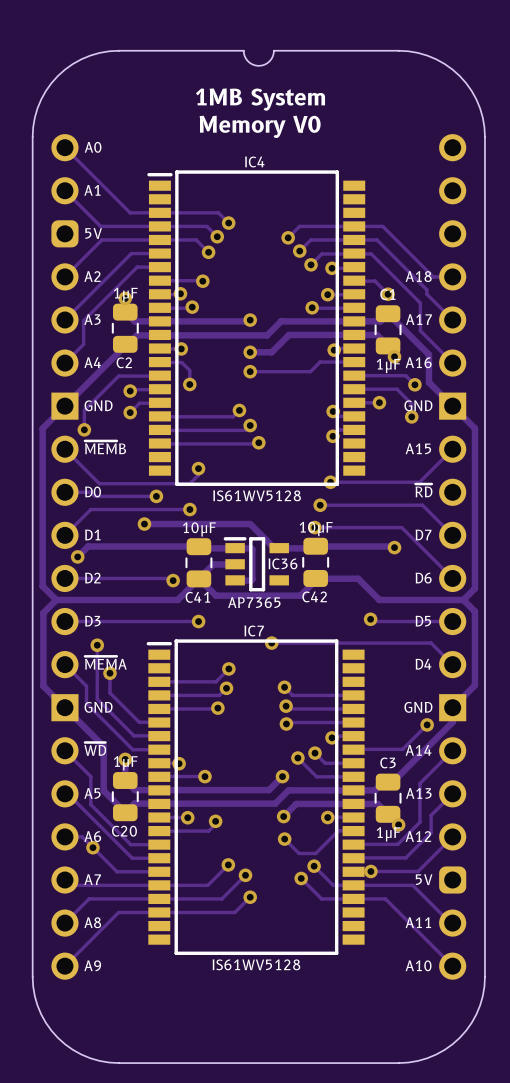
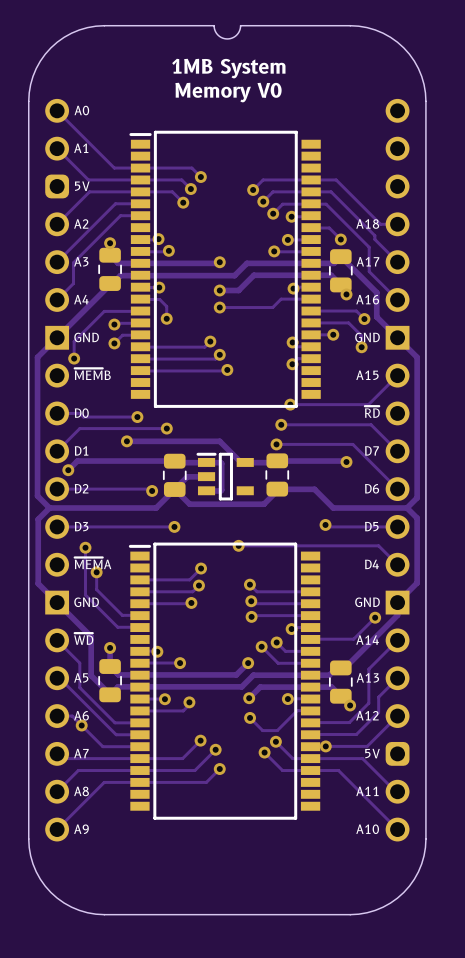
IC4 name: IC4 (254, 161) -> none
track: (159, 280) (202, 281) -> none
via: (202, 281) -> none
C2 value: 1μF (125, 294) -> none
C1 name: C1 (387, 294) -> none
C2 name: C2 (124, 362) -> none
C1 value: 1μF (388, 365) -> none
track: (64, 449) (99, 483) (189, 483) (198, 475) (198, 468) -> none
via: (198, 468) -> none
IC4 text: IS61WV5128 (257, 495) -> none
C42 value: 10μF (316, 528) -> none
C41 value: 10μF (199, 529) -> none
IC36 name: IC36 (282, 563) -> none
C42 name: C42 (314, 596) -> none
C41 name: C41 (197, 597) -> none
IC36 text: AP7365 (254, 602) -> none
IC7 name: IC7 (254, 630) -> none
track: (64, 664) (86, 686) (86, 703) (132, 749) (159, 749) -> none
C3 name: C3 (387, 762) -> none
C20 value: 1μF (125, 763) -> none
C20 name: C20 (124, 831) -> none
C3 value: 1μF (388, 834) -> none
IC7 text: IS61WV5128 (256, 964) -> none

